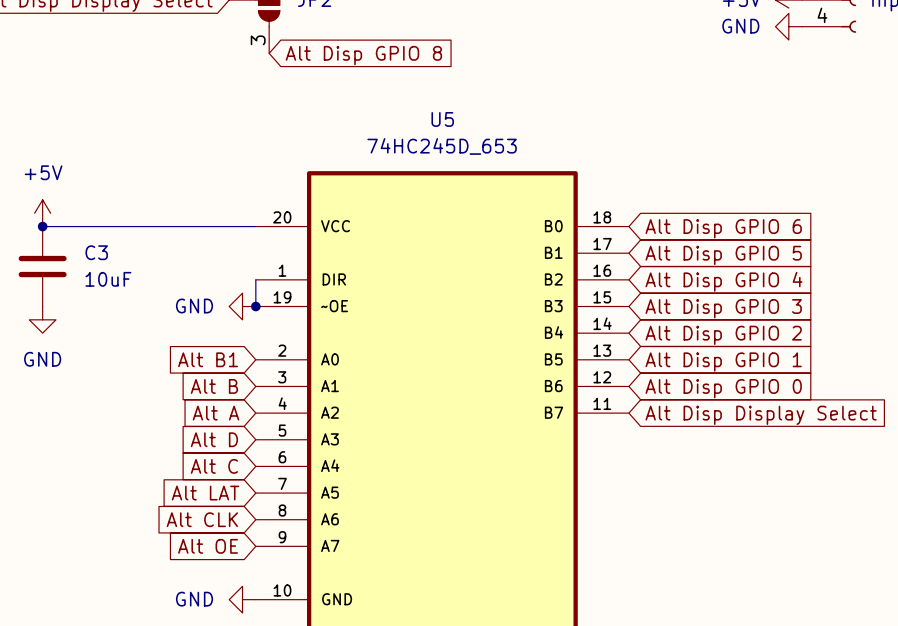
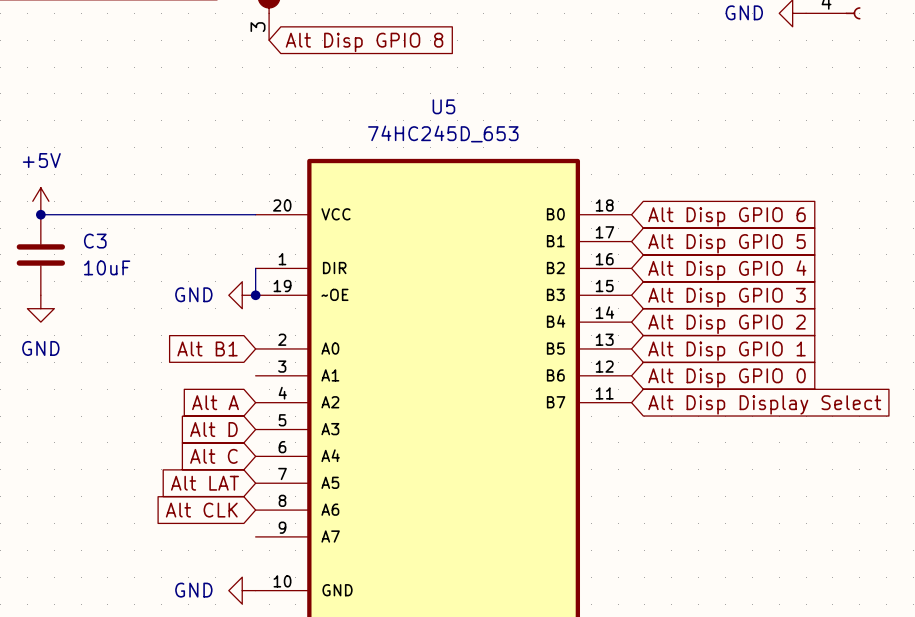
global label: Alt B (214, 386) -> none
global label: Alt OE (208, 546) -> none

